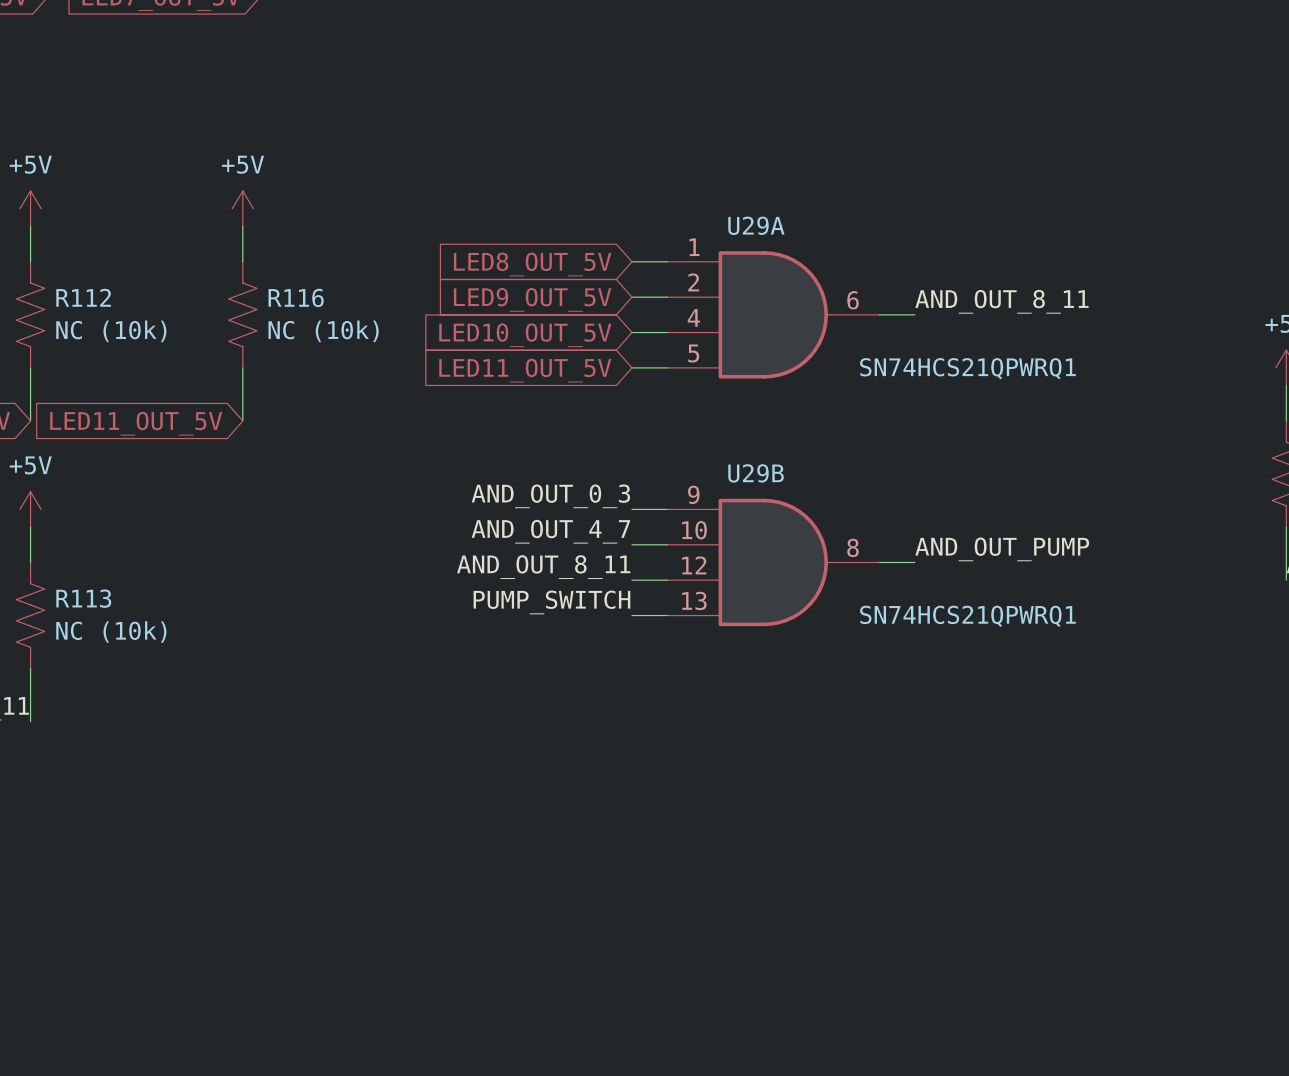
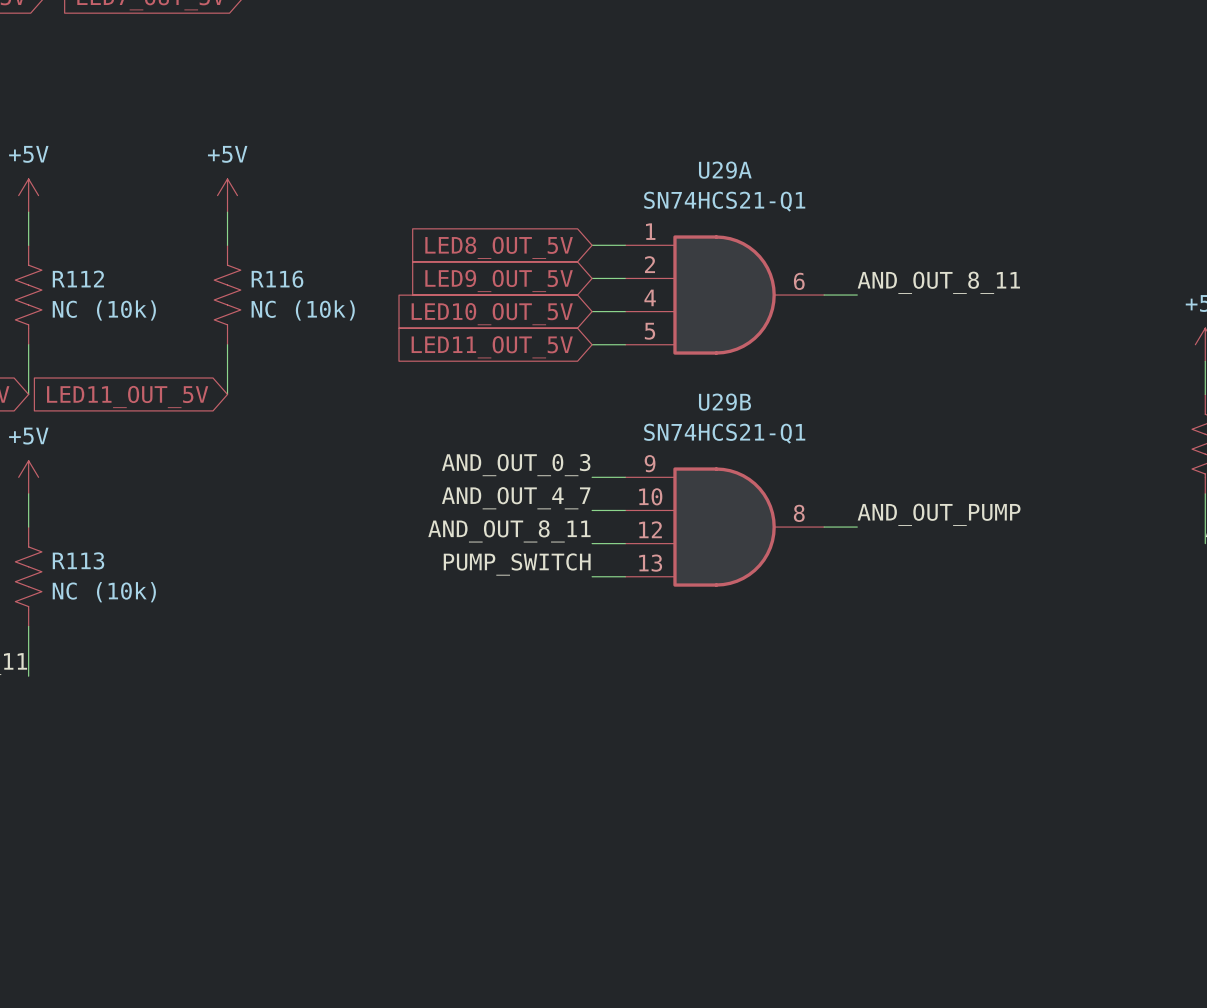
U29A name position: U29A (756, 225) -> U29A (725, 170)
U29A value: SN74HCS21QPWRQ1 (967, 368) -> SN74HCS21-Q1 (724, 201)
U29B name position: U29B (756, 473) -> U29B (724, 402)
U29B value: SN74HCS21QPWRQ1 (967, 616) -> SN74HCS21-Q1 (724, 433)

